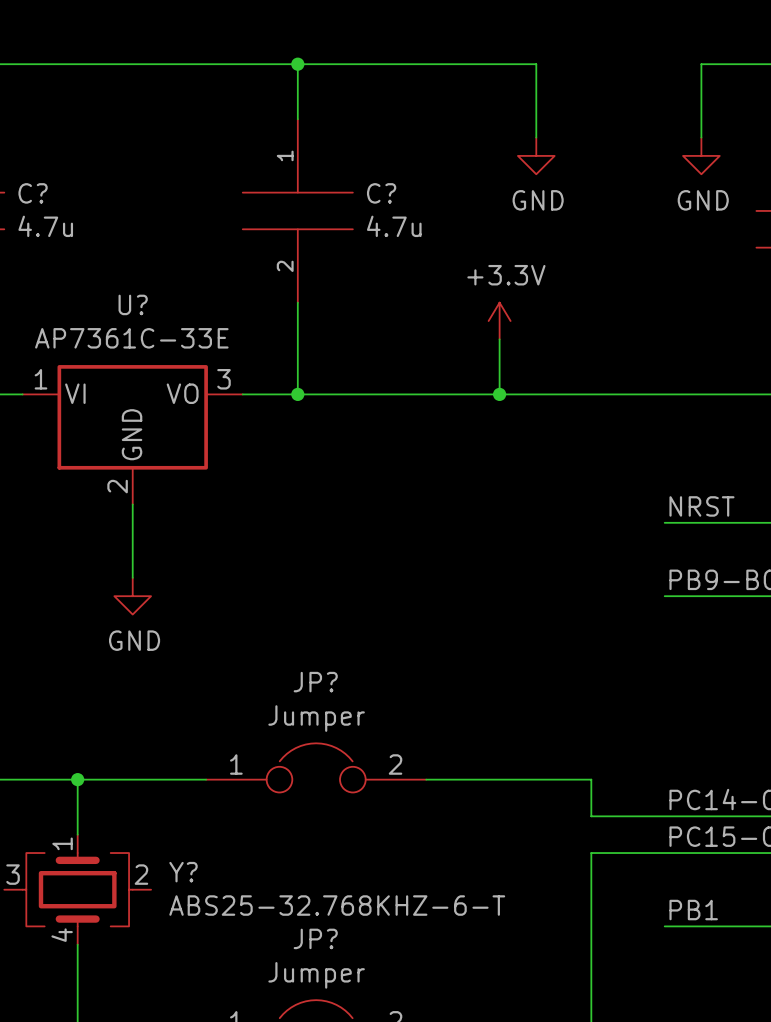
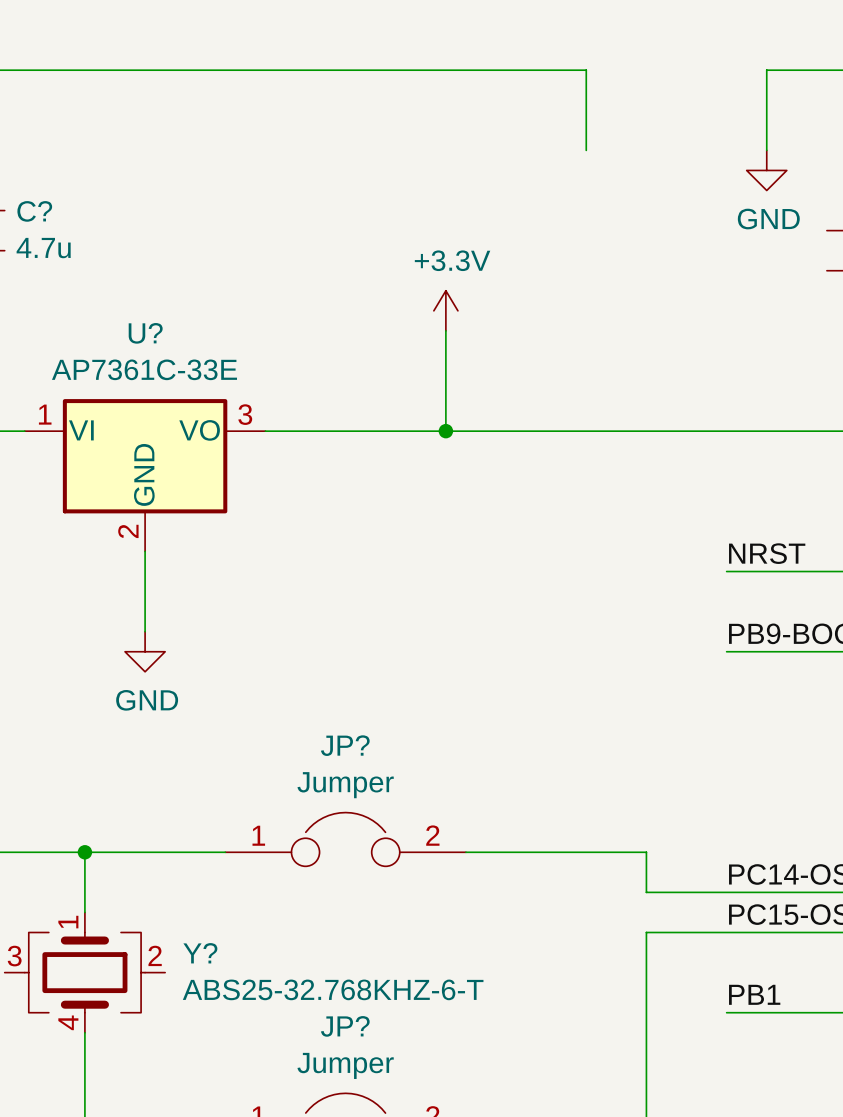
wire: (297, 64) (297, 119) -> none
junction: (297, 64) -> none
power symbol: GND (536, 155) -> none
C?: 4.7u (297, 210) -> none
wire: (297, 302) (297, 394) -> (445, 330) (445, 431)
power symbol position: +3.3V (499, 321) -> +3.3V (445, 310)
wire: (499, 339) (499, 394) -> none
junction: (297, 394) -> none
junction: none -> (445, 431)
junction: (499, 394) -> none

